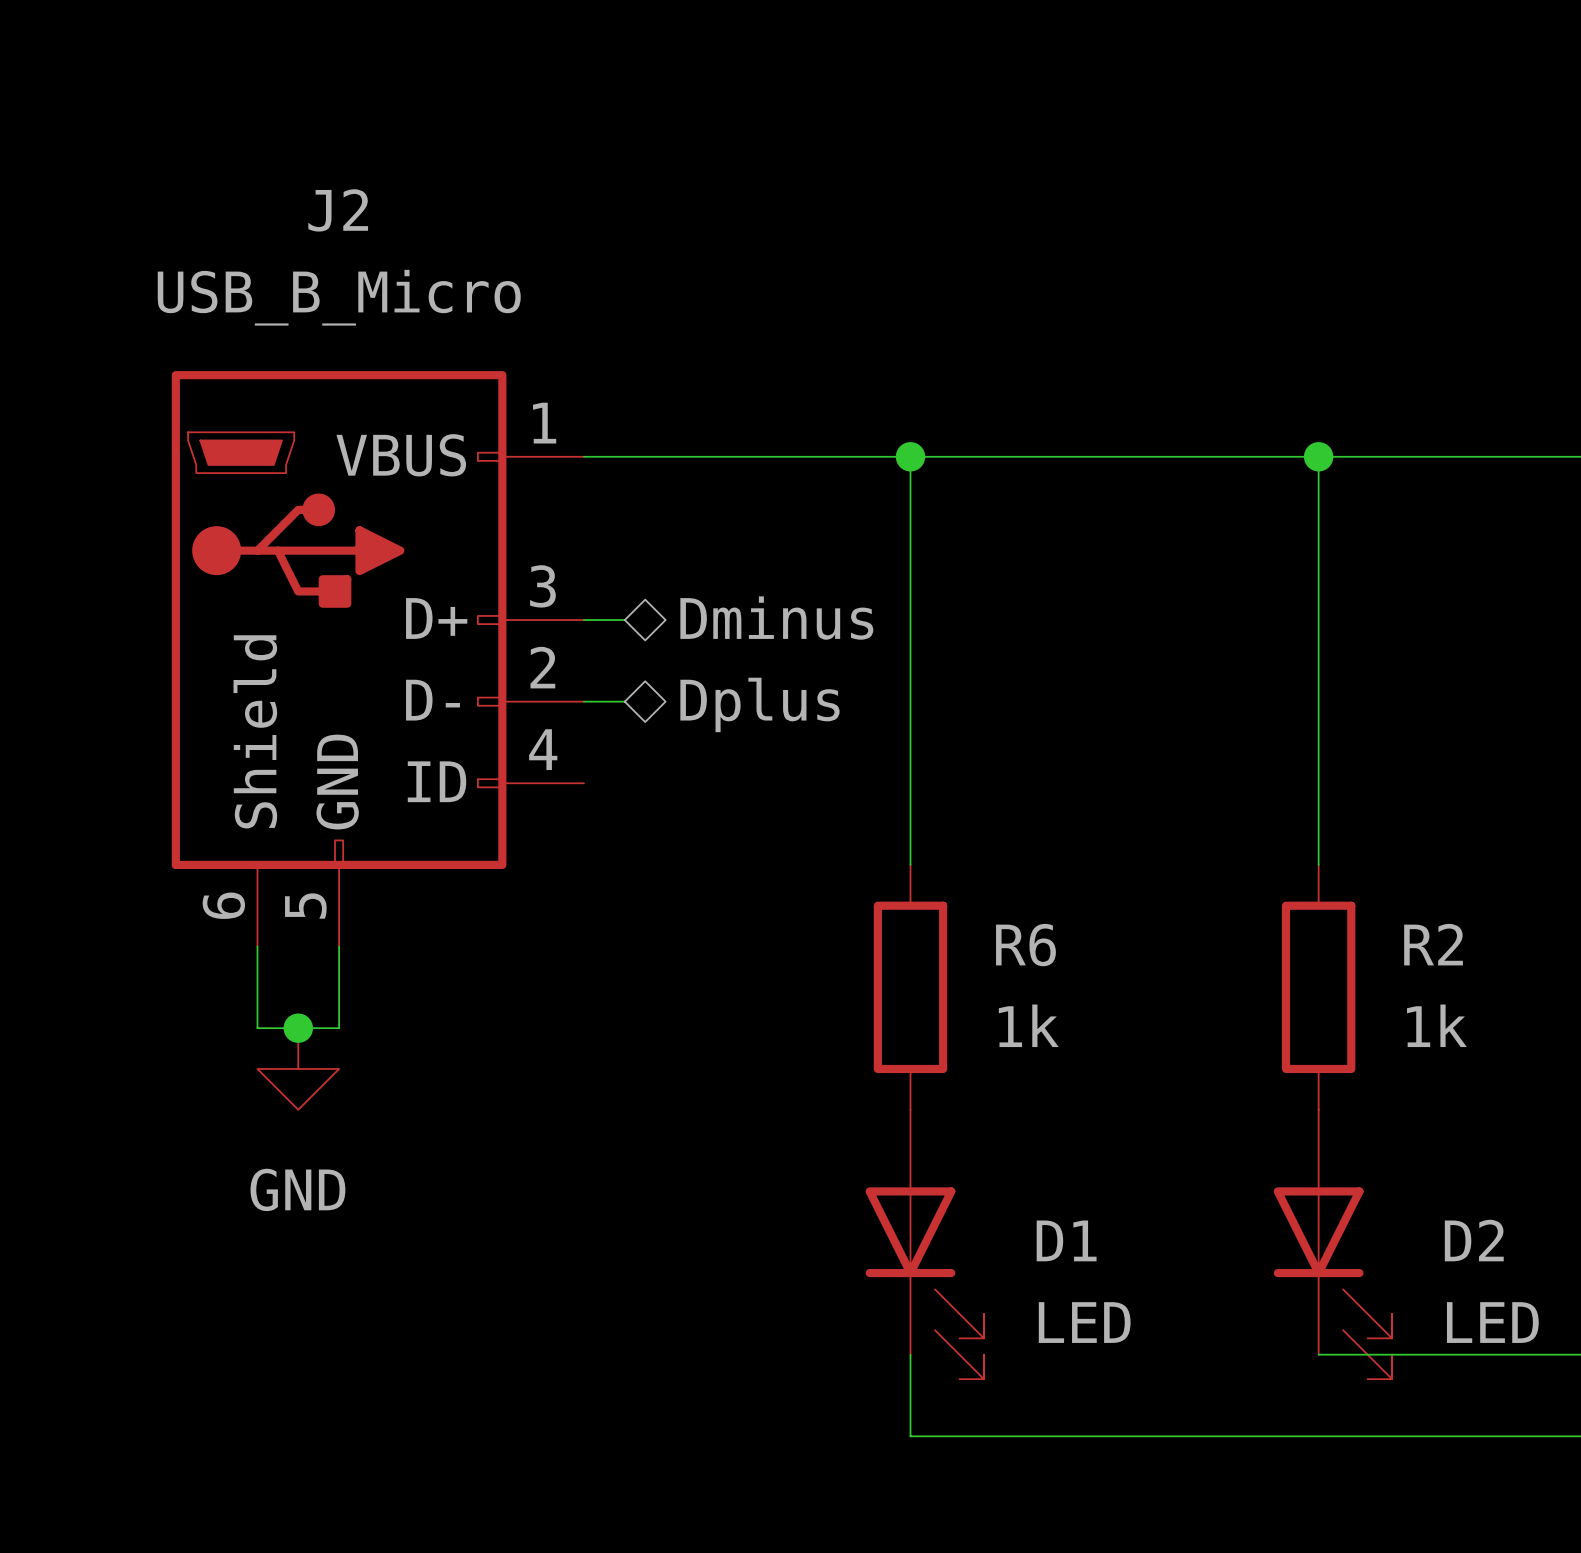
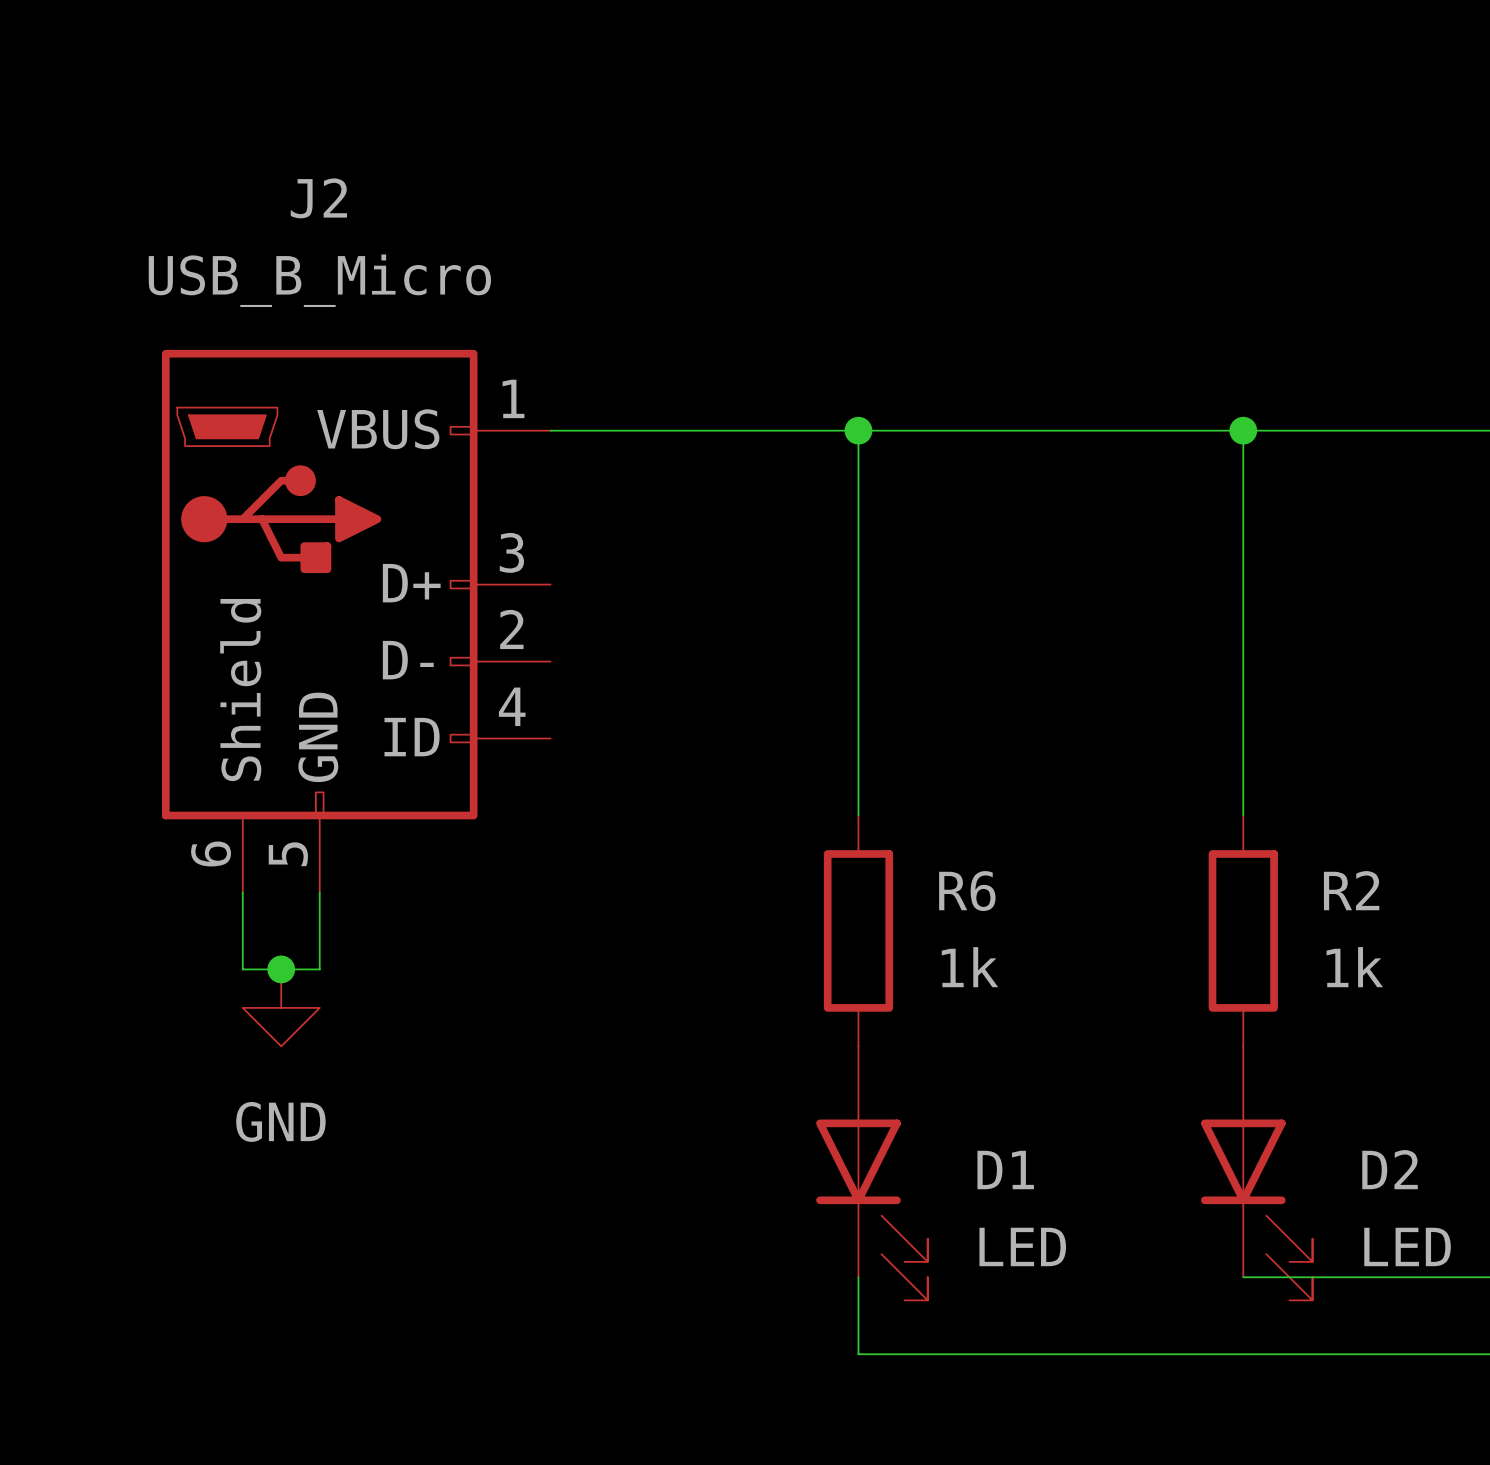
hierarchical label: Dminus (776, 618) -> none
wire: (583, 620) (624, 620) -> none
wire: (583, 701) (624, 701) -> none
hierarchical label: Dplus (759, 704) -> none

